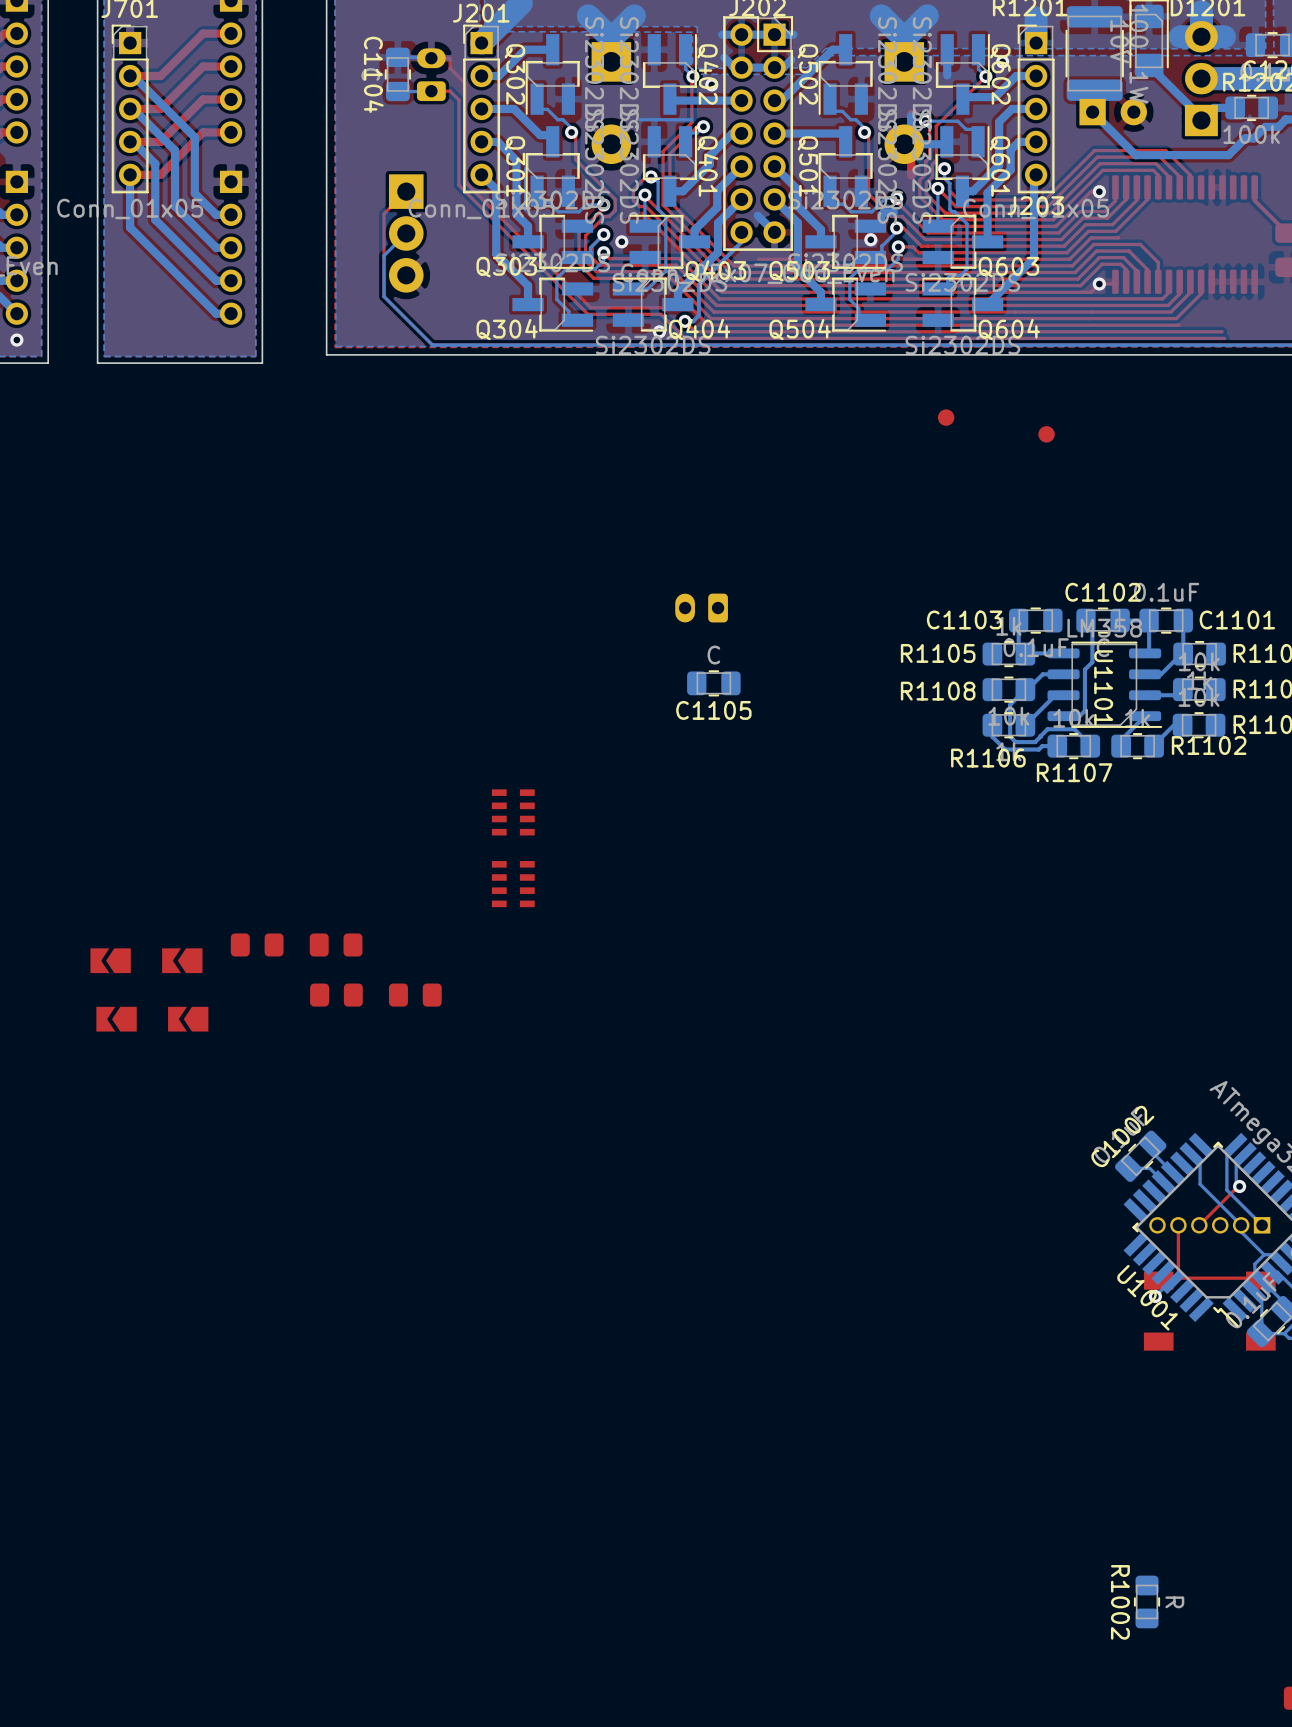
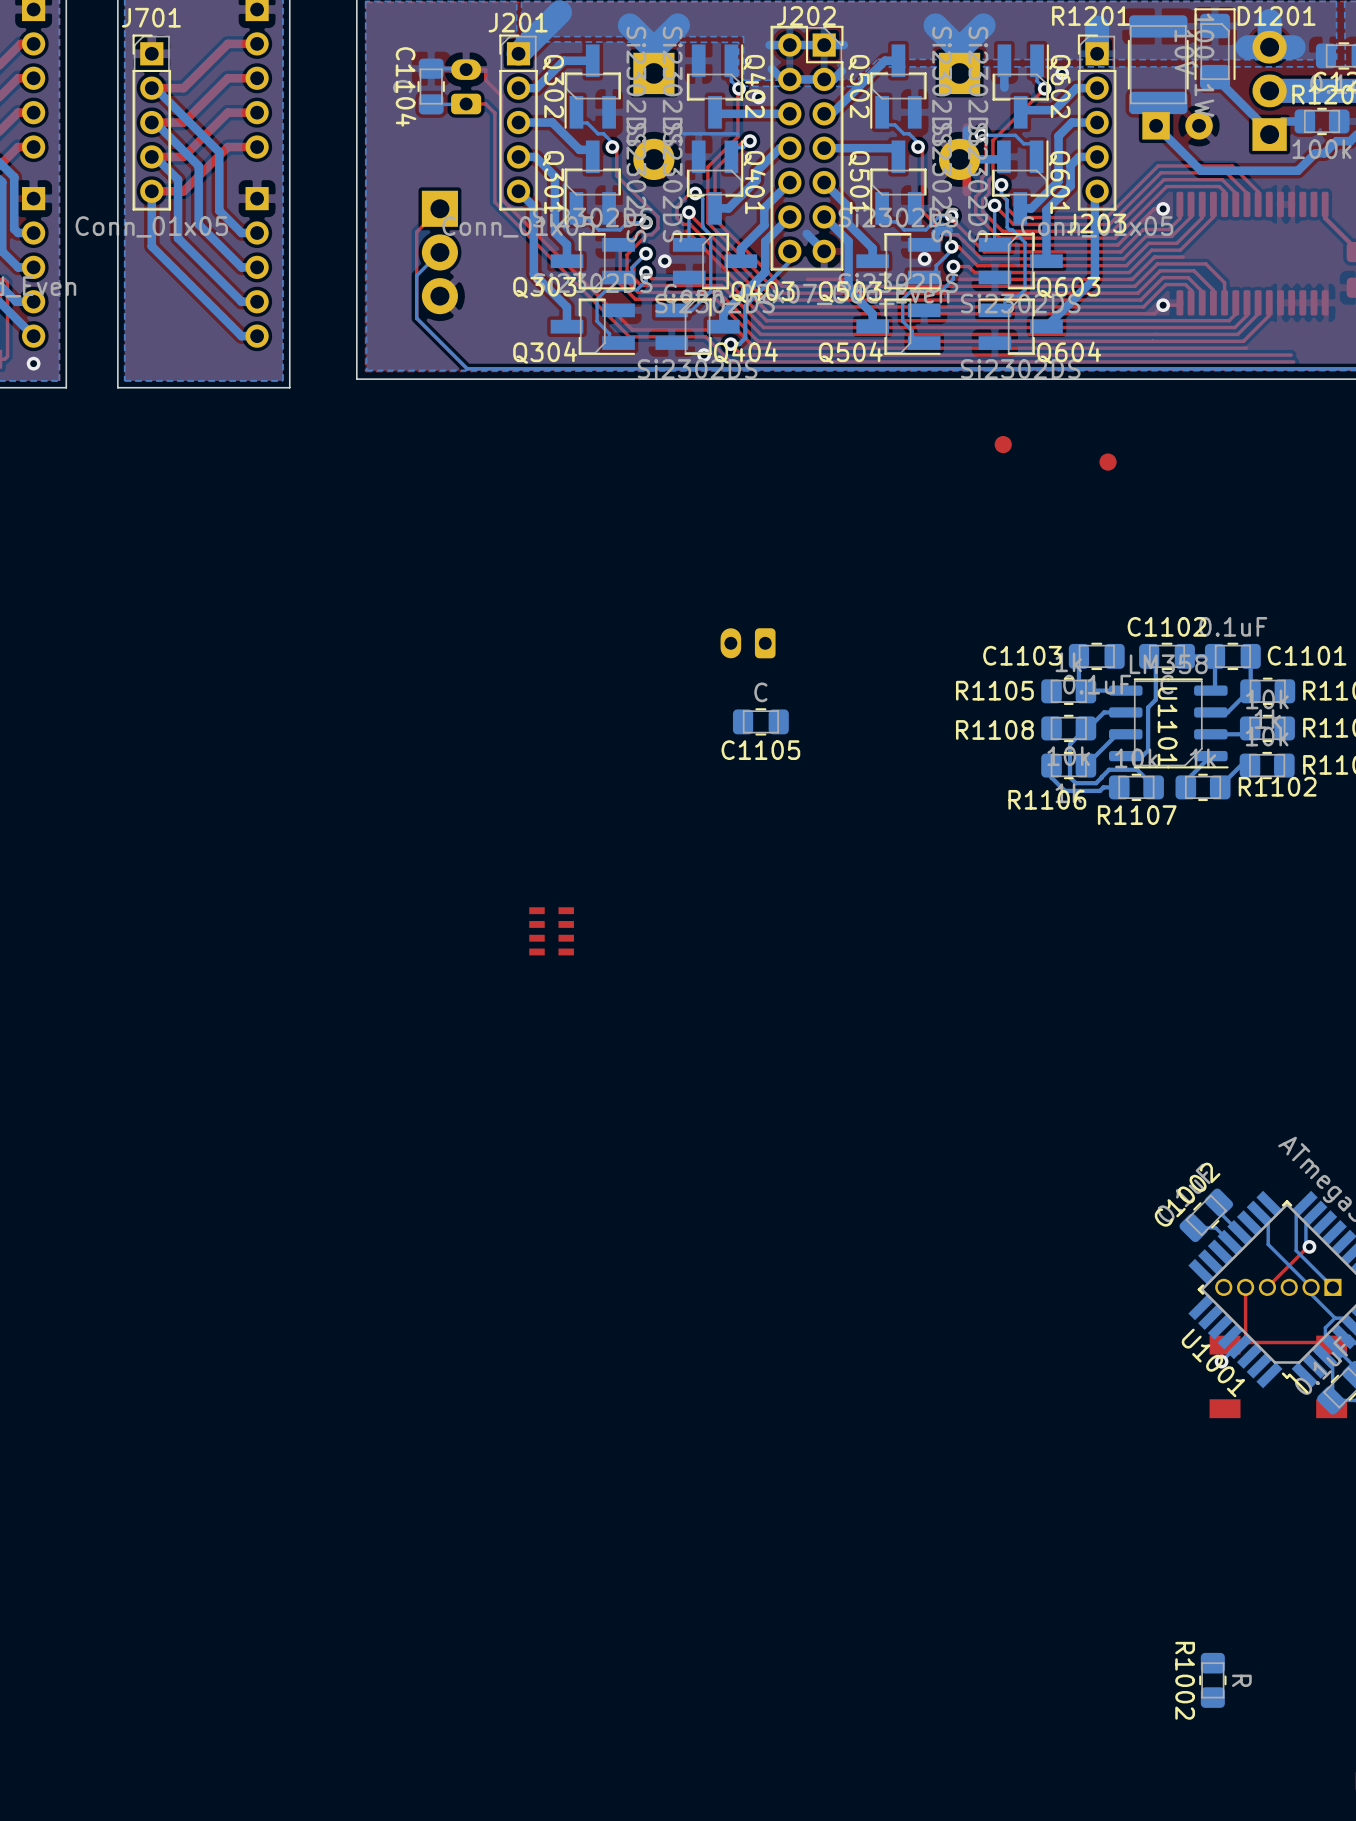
part: (513, 812) -> none
part: (257, 944) -> none
part: (336, 944) -> none
part: (110, 960) -> none
part: (182, 960) -> none
part: (336, 995) -> none
part: (415, 995) -> none
part: (116, 1019) -> none
part: (188, 1019) -> none

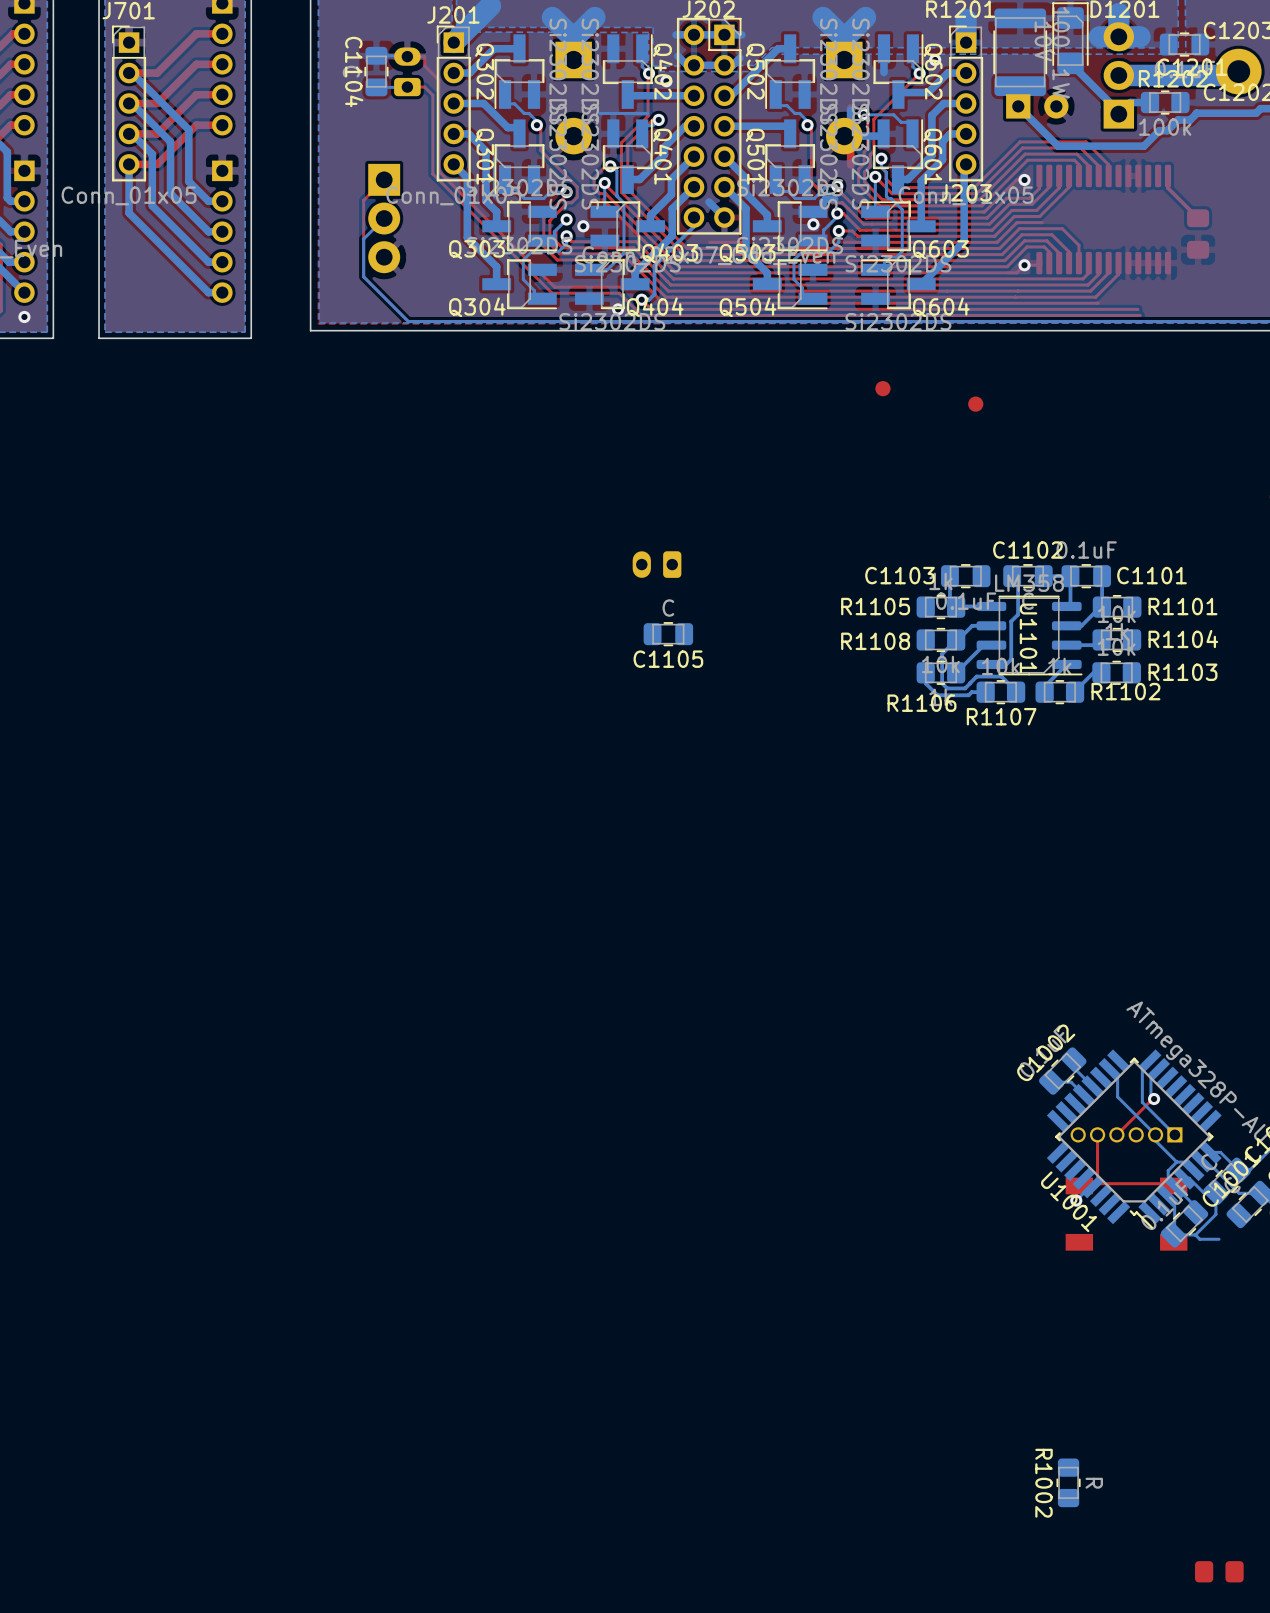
part: (551, 931) -> none

